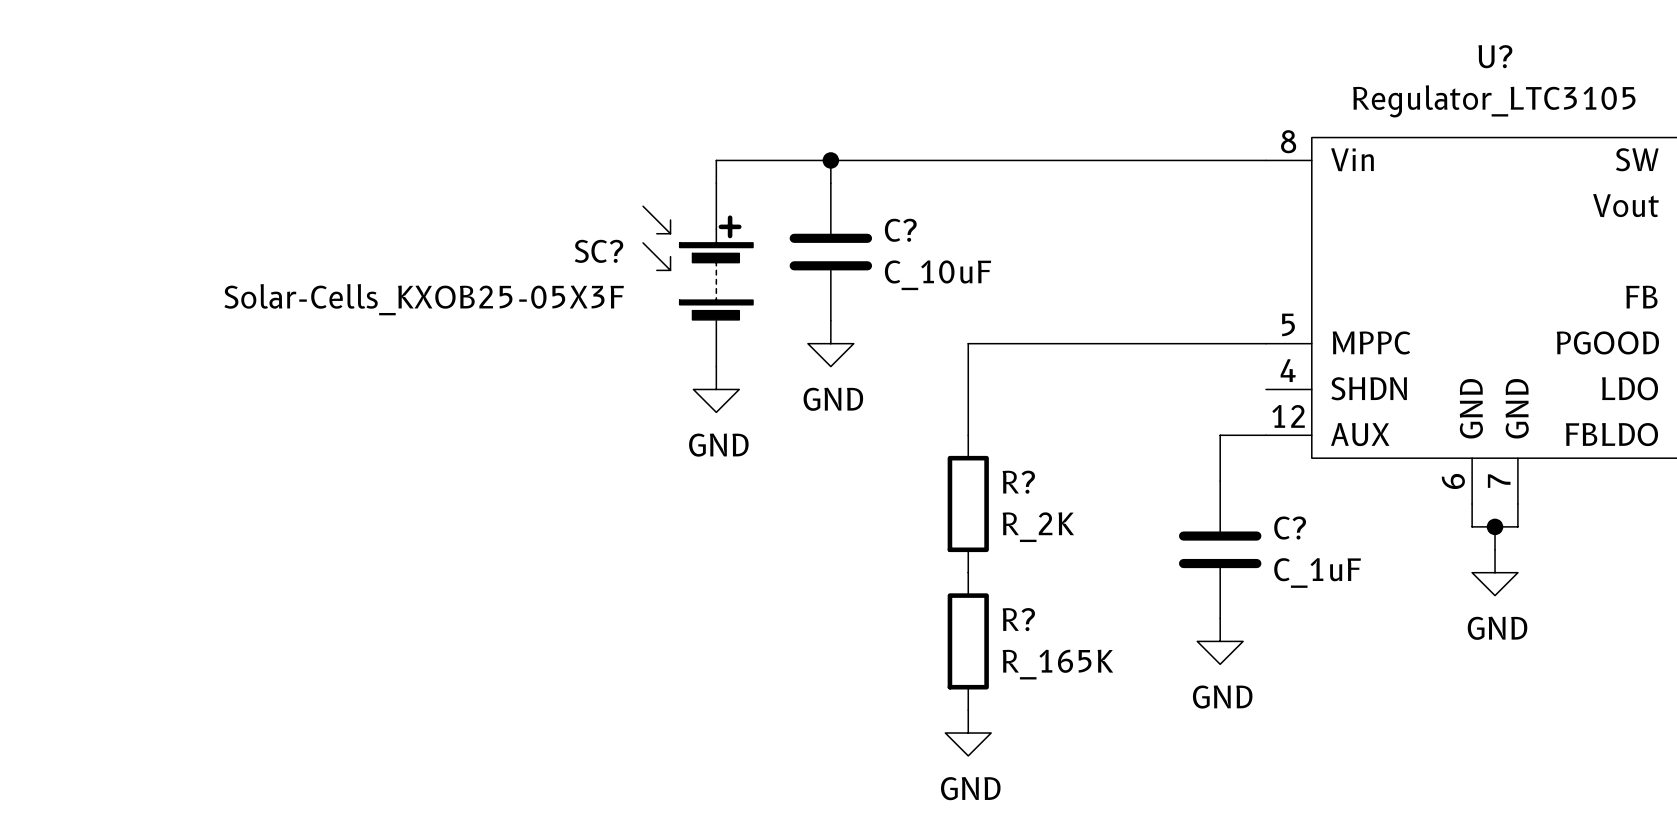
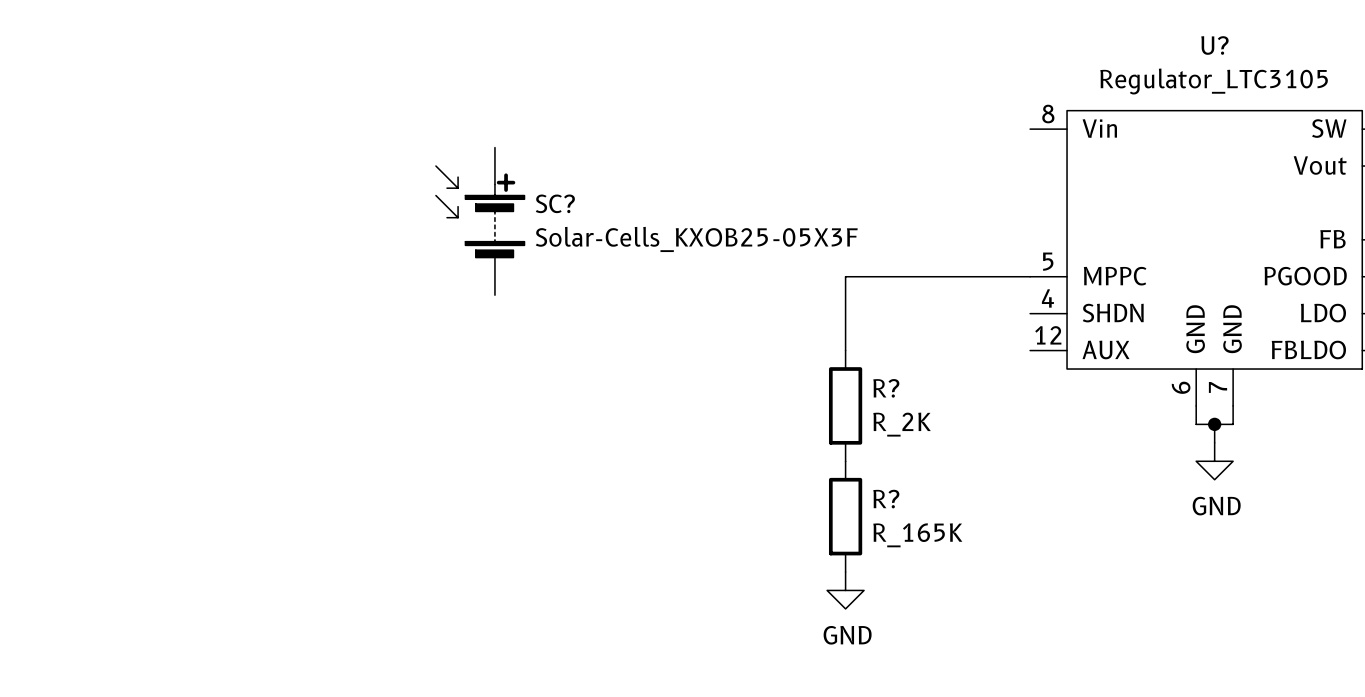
wire: (830, 160) (830, 183) -> none
junction: (830, 160) -> none
wire: (1265, 160) (716, 160) (716, 183) -> none
SC? name position: SC? (598, 251) -> SC? (555, 203)
C?: C_10uF (830, 252) -> none
SC? position: (698, 274) -> (480, 221)
SC? value position: Solar-Cells_KXOB25-05X3F (424, 299) -> Solar-Cells_KXOB25-05X3F (696, 239)
power symbol: GND (830, 343) -> none
wire: (1036, 343) (968, 343) (968, 435) -> (845, 276) (845, 350)
power symbol: GND (716, 389) -> none
wire: (1265, 435) (1220, 435) (1220, 481) -> none
R? position: (968, 503) -> (845, 405)
C?: C_1uF (1220, 549) -> none
R? position: (968, 641) -> (845, 516)
power symbol: GND (1220, 641) -> none
power symbol position: GND (968, 733) -> GND (845, 590)

